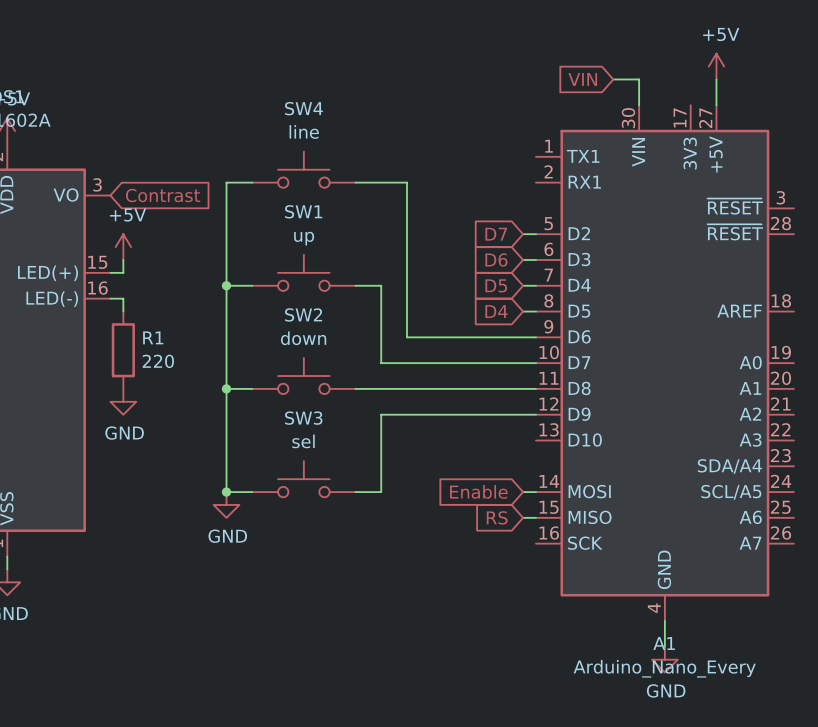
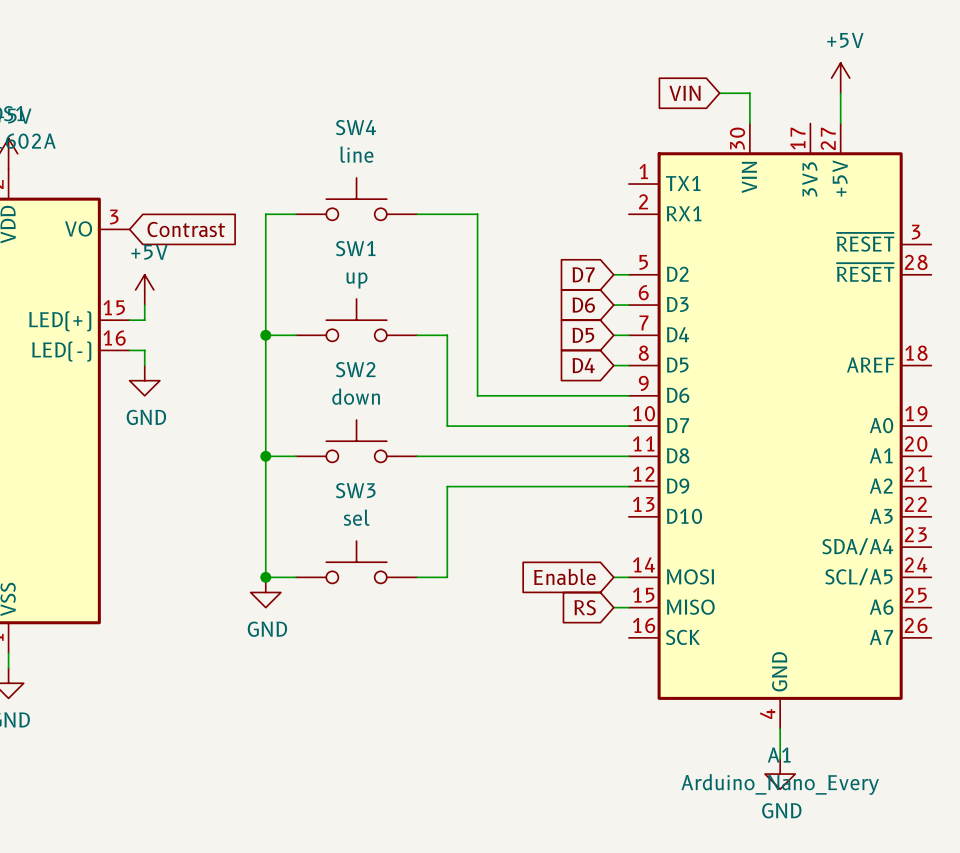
R1: 220 (123, 350) -> none
power symbol position: GND (123, 401) -> GND (144, 380)

